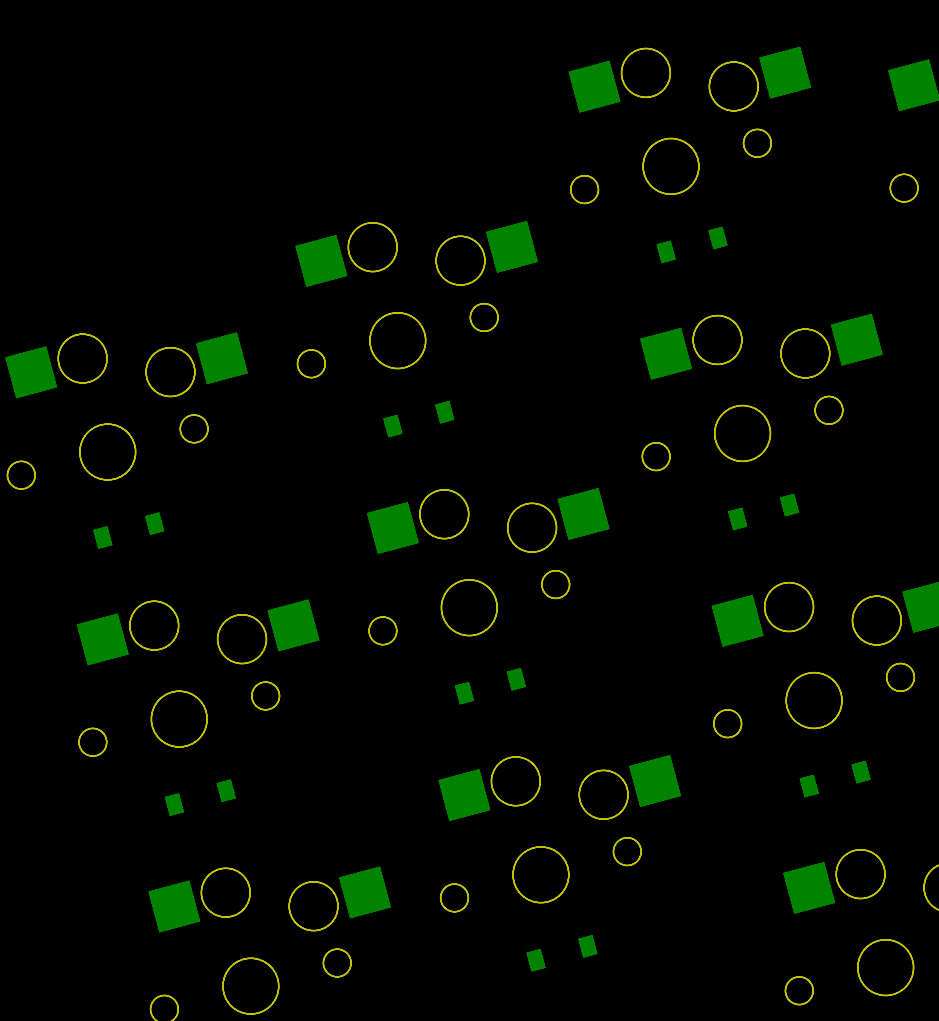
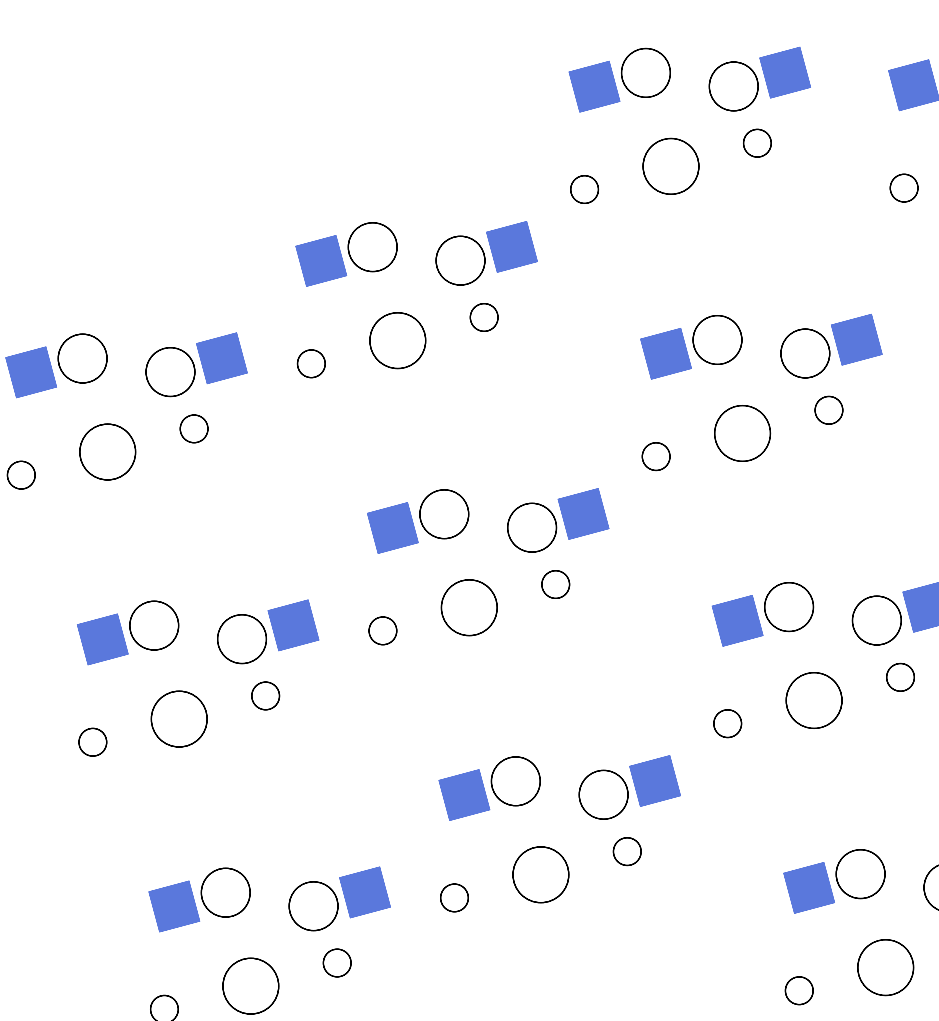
part: (692, 244) -> none
part: (418, 419) -> none
part: (763, 512) -> none
part: (128, 530) -> none
part: (490, 686) -> none
part: (835, 779) -> none
part: (200, 797) -> none
part: (561, 953) -> none

